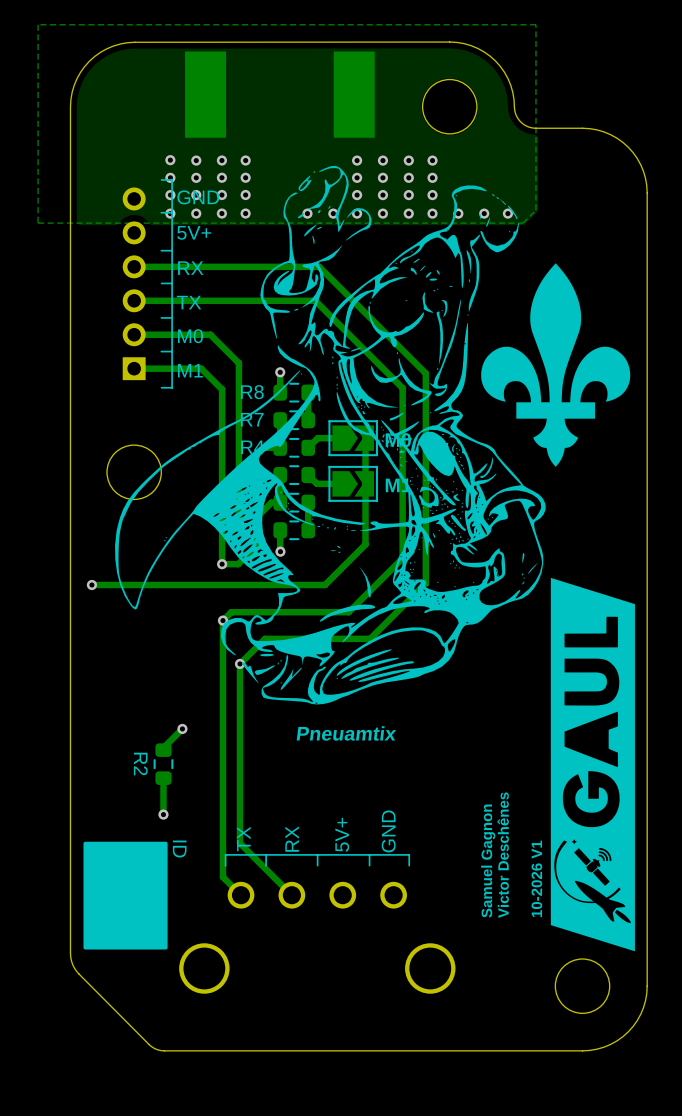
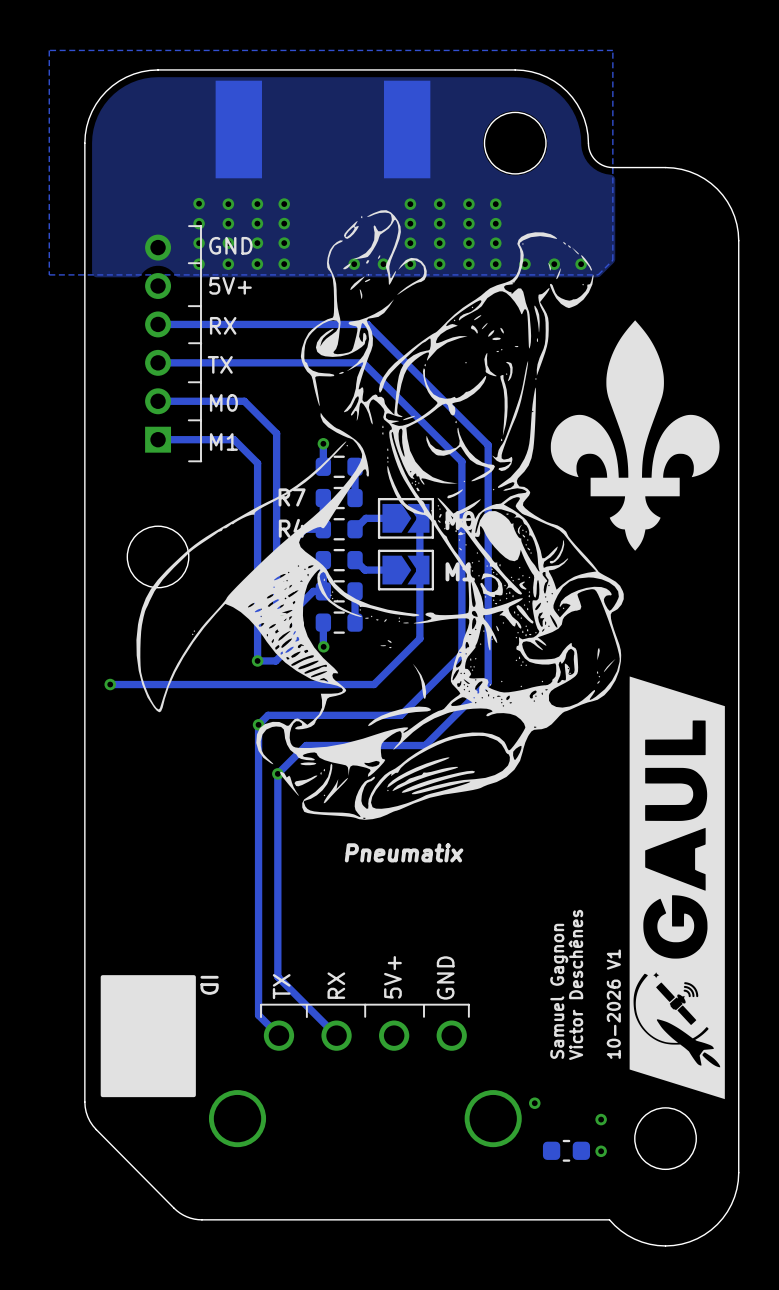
board edge: (449, 42) (127, 42) (113, 45) (94, 56) (84, 66) (74, 85) (70, 106) (71, 961) (79, 974) (149, 1044) (156, 1049) (164, 1050) (589, 1050) (610, 1044) (622, 1036) (633, 1026) (643, 1007) (647, 986) -> (515, 69) (149, 70) (126, 77) (112, 85) (100, 97) (88, 118) (84, 143) (86, 1112) (96, 1129) (174, 1208) (183, 1215) (194, 1219) (609, 1219) (621, 1230) (634, 1239) (649, 1244) (665, 1245) (681, 1244) (704, 1234) (717, 1224) (727, 1211) (734, 1196) (738, 1180) (738, 1138)
R8 name: R8 (252, 392) -> none
track: (182, 728) (163, 750) -> none
via: (182, 728) -> none
text: Pneuamtix (346, 733) -> Pneumatix (404, 852)
R2: (163, 764) -> none
track: (163, 778) (163, 814) -> none
via: (163, 814) -> none
text position: GND (388, 831) -> GND (445, 977)
text position: 5V+ (342, 834) -> 5V+ (392, 977)
text position: TX (243, 839) -> TX (281, 986)
text position: RX (292, 839) -> RX (336, 985)
line: (225, 854) (409, 854) (409, 865) -> (261, 1004) (468, 1004) (468, 1016)
line: (317, 854) (317, 865) -> (365, 1004) (365, 1016)
line: (225, 855) (225, 865) -> (261, 1004) (261, 1017)
line: (266, 855) (266, 865) -> (306, 1004) (306, 1017)
line: (369, 855) (369, 865) -> (423, 1005) (423, 1016)
via: none -> (534, 1103)
via: none -> (601, 1119)
part: none -> (566, 1150)
via: none -> (601, 1151)

